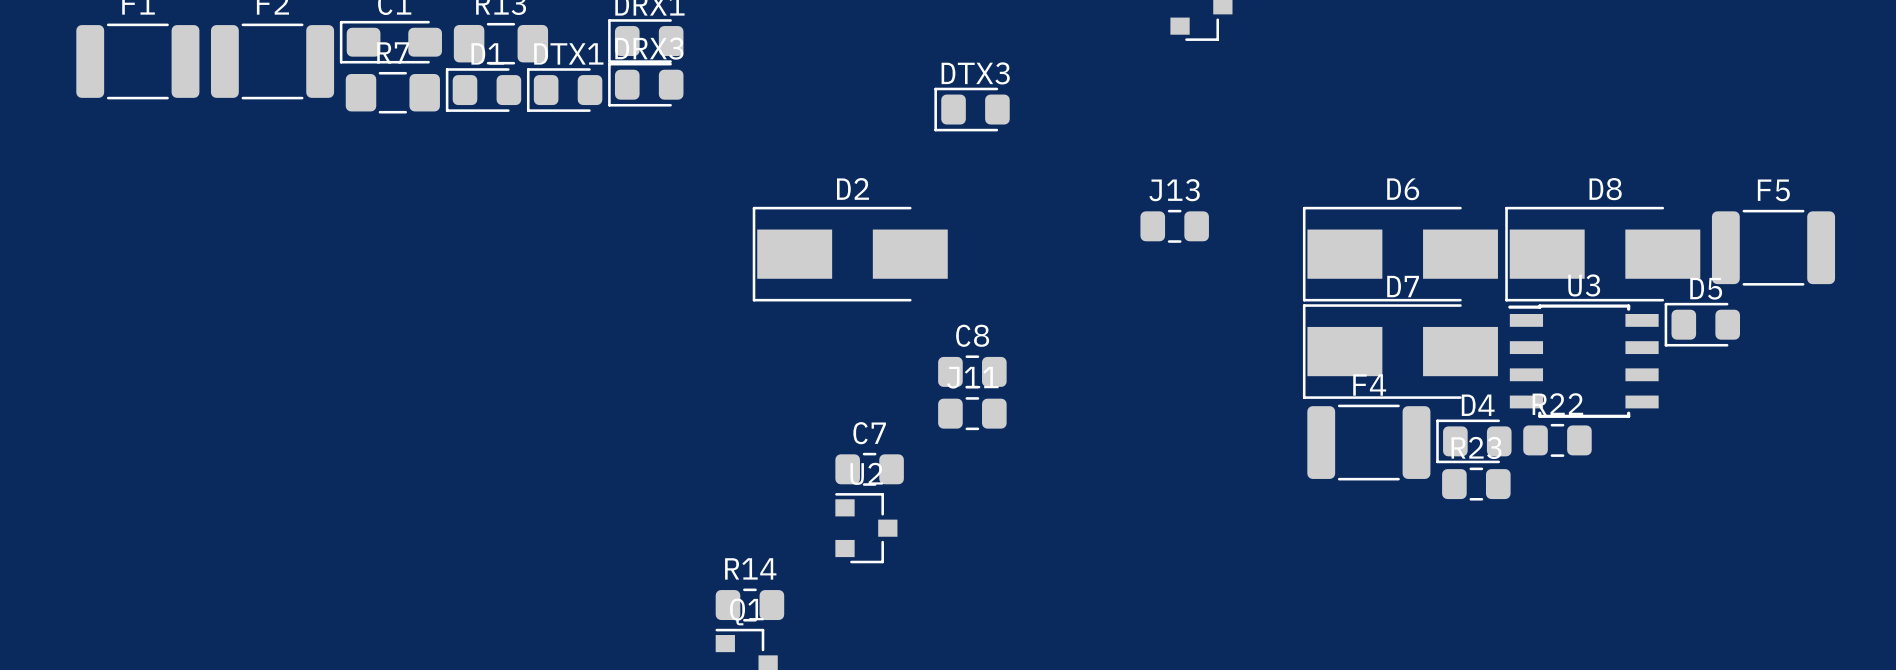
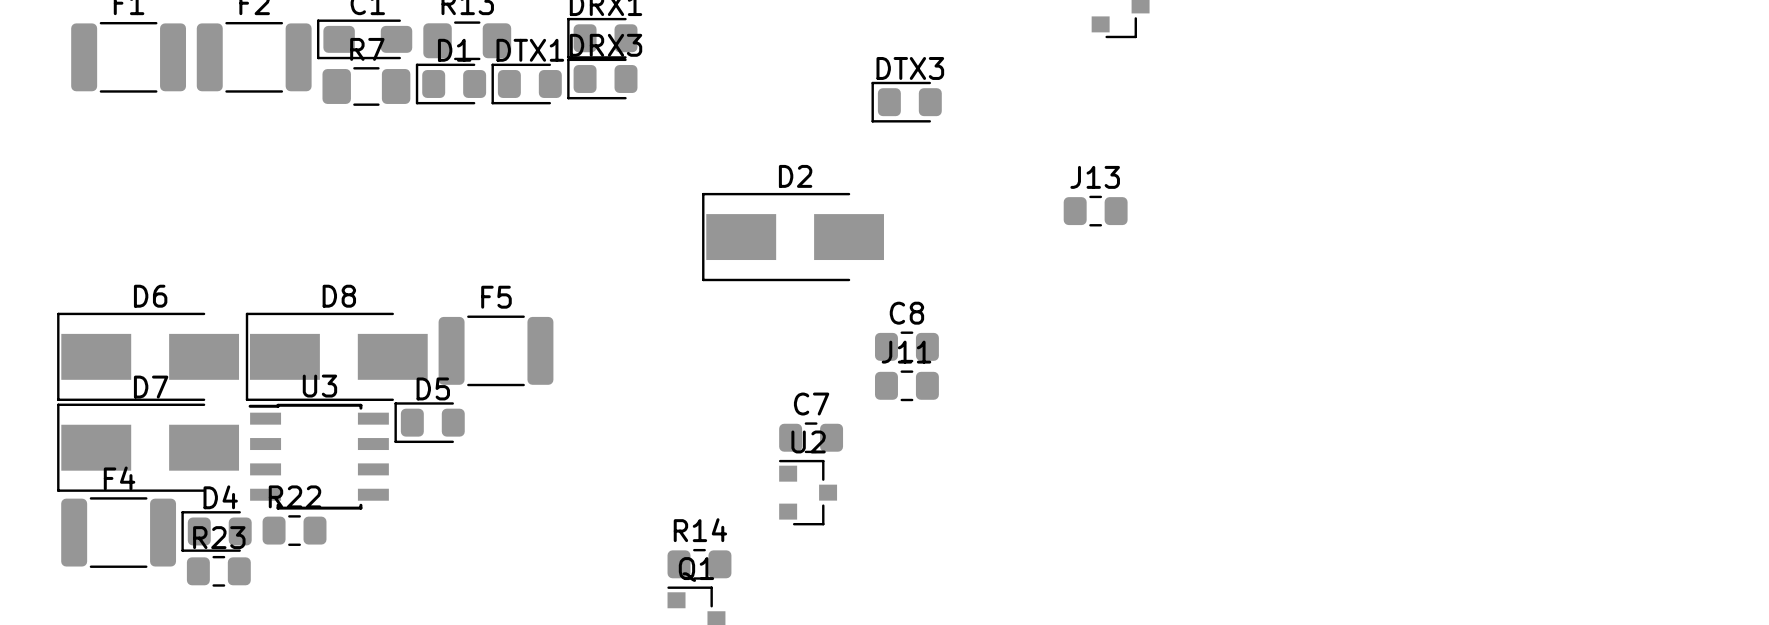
F5 position: (1773, 247) -> (496, 350)
D6 position: (1400, 254) -> (148, 356)
D8 position: (1602, 254) -> (336, 356)
D5 position: (1702, 324) -> (429, 422)
D7 position: (1400, 351) -> (148, 447)
U3 position: (1583, 361) -> (318, 456)
R22 position: (1557, 440) -> (294, 530)
D4 position: (1473, 441) -> (216, 531)
F4 position: (1368, 442) -> (118, 532)
R23 position: (1476, 484) -> (218, 571)

